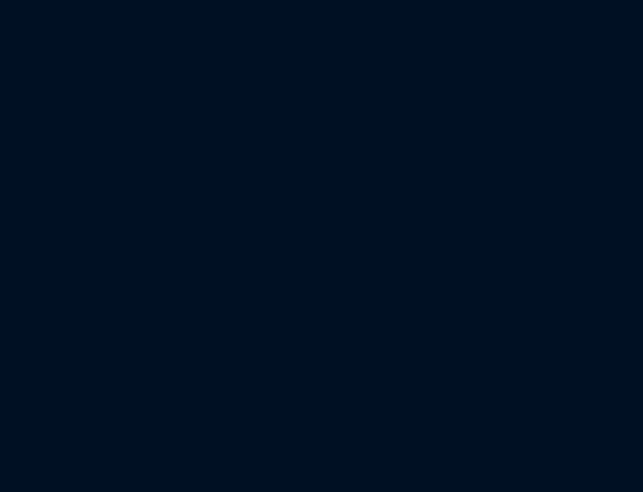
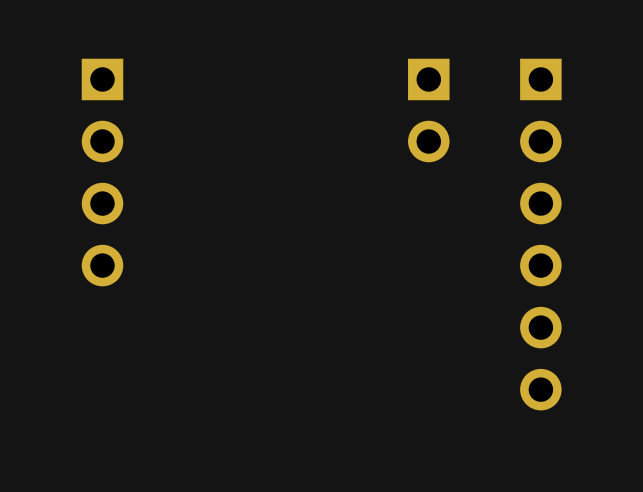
part: none -> (428, 110)
part: none -> (102, 172)
part: none -> (540, 234)

